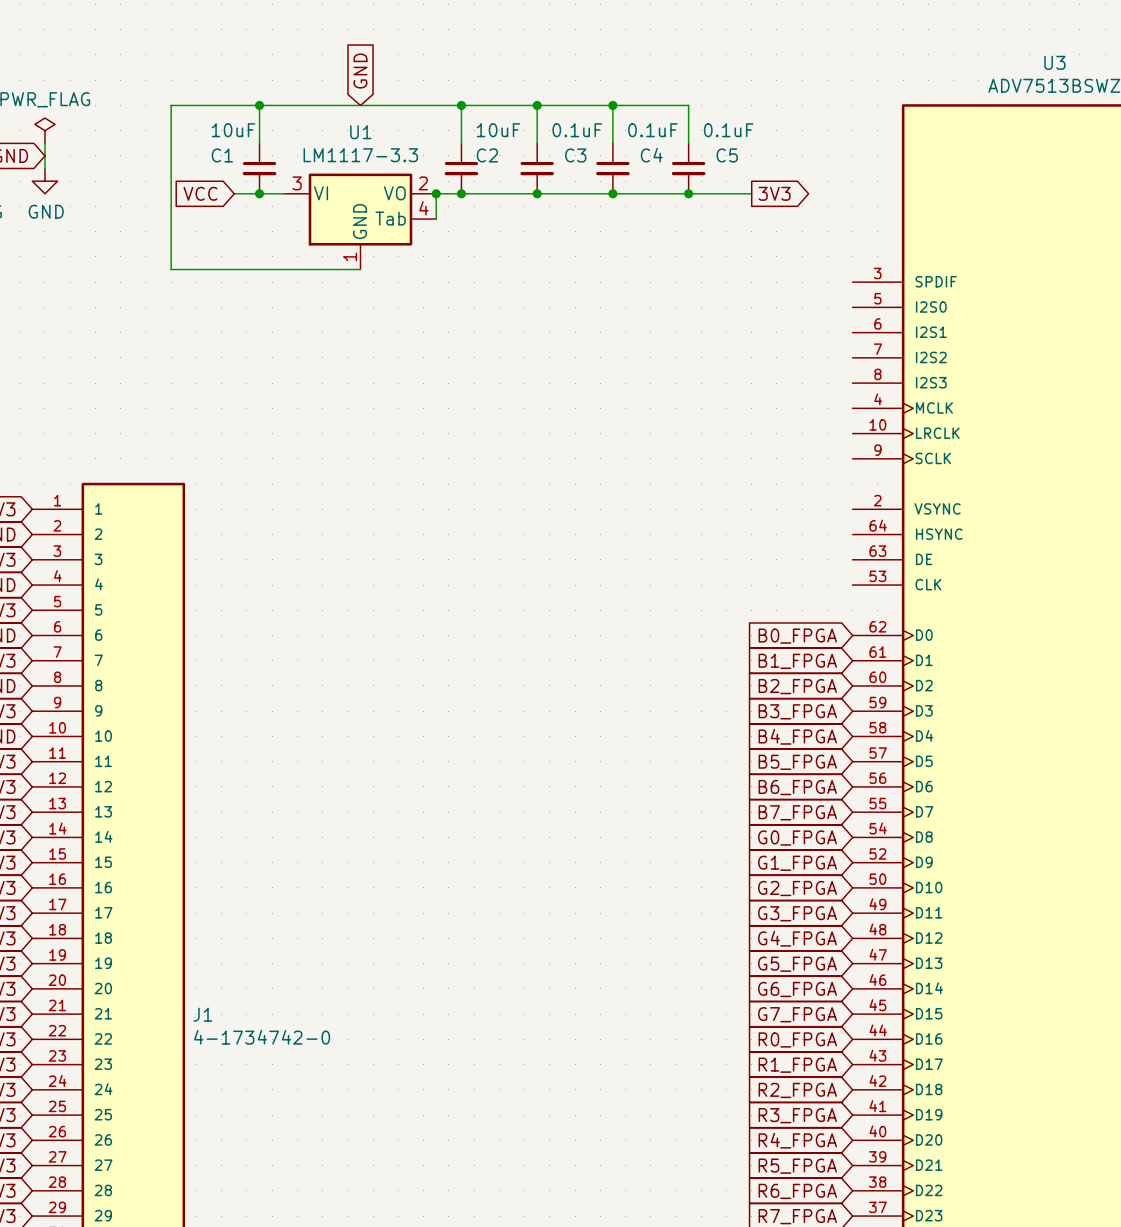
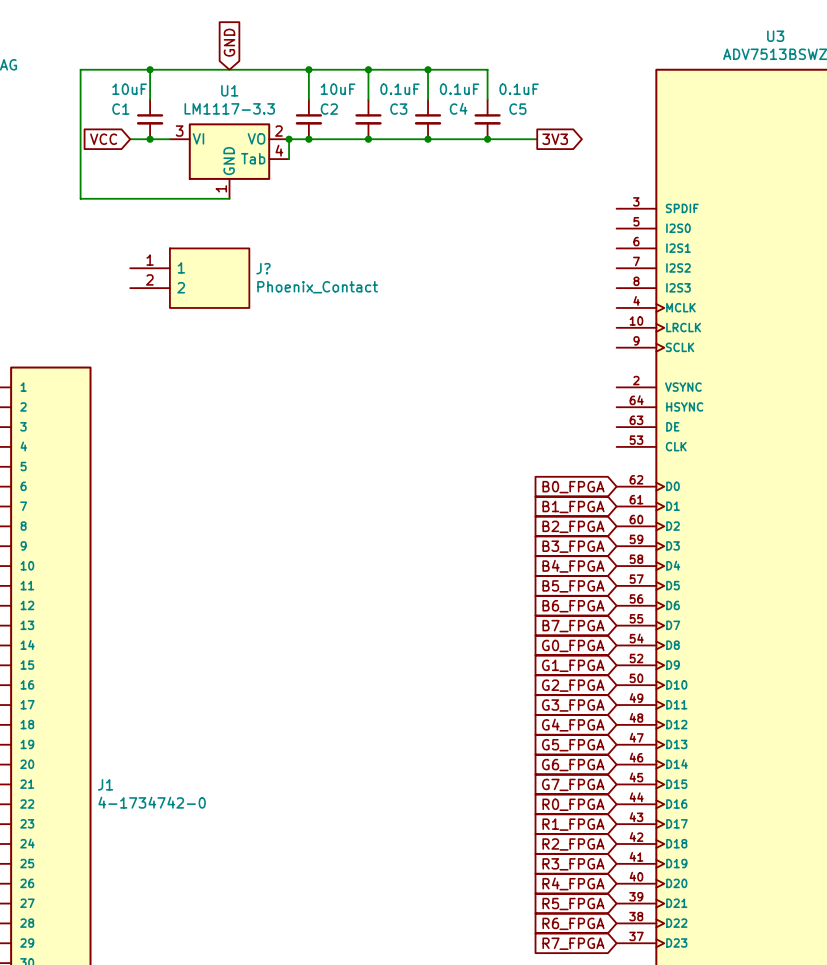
J?: none -> Phoenix_Contact (190, 278)

